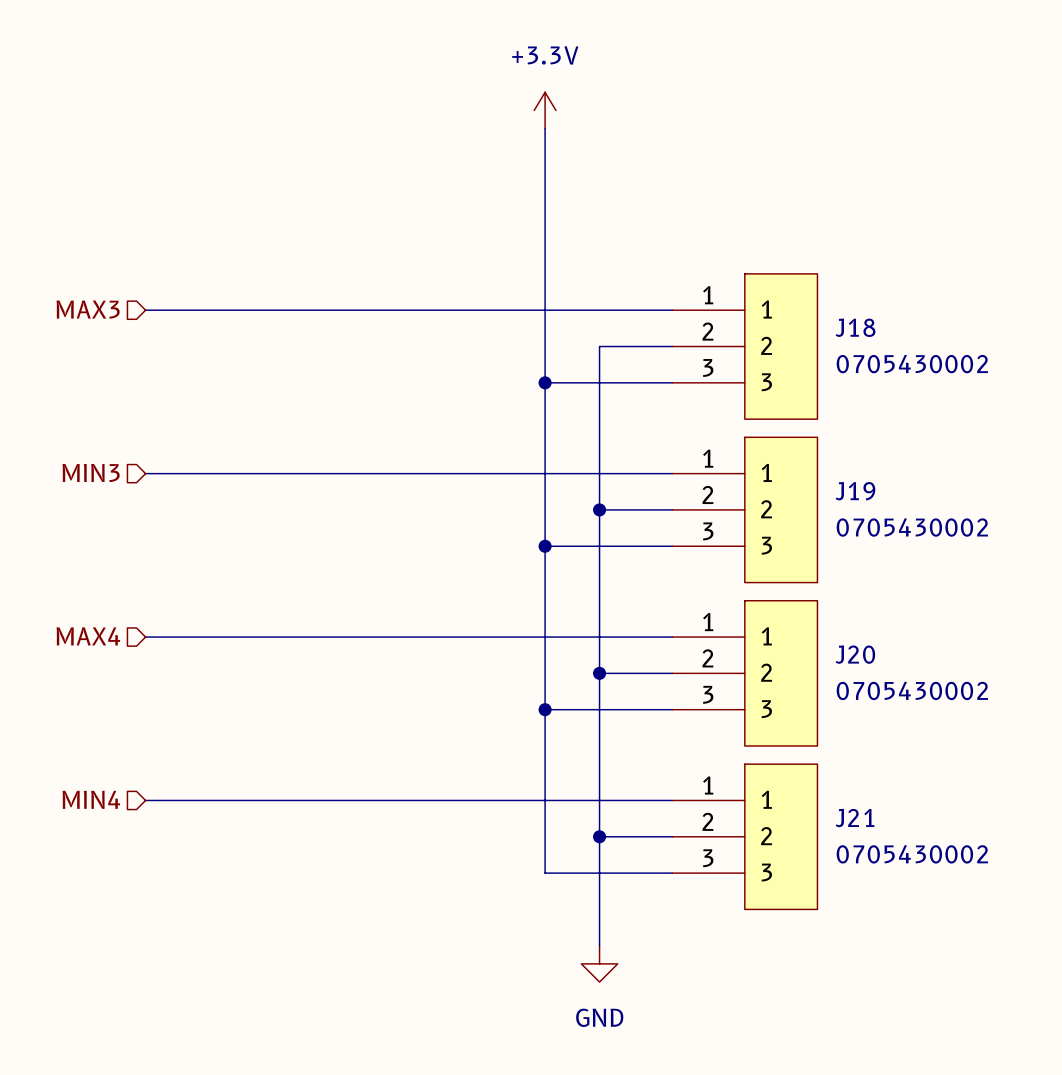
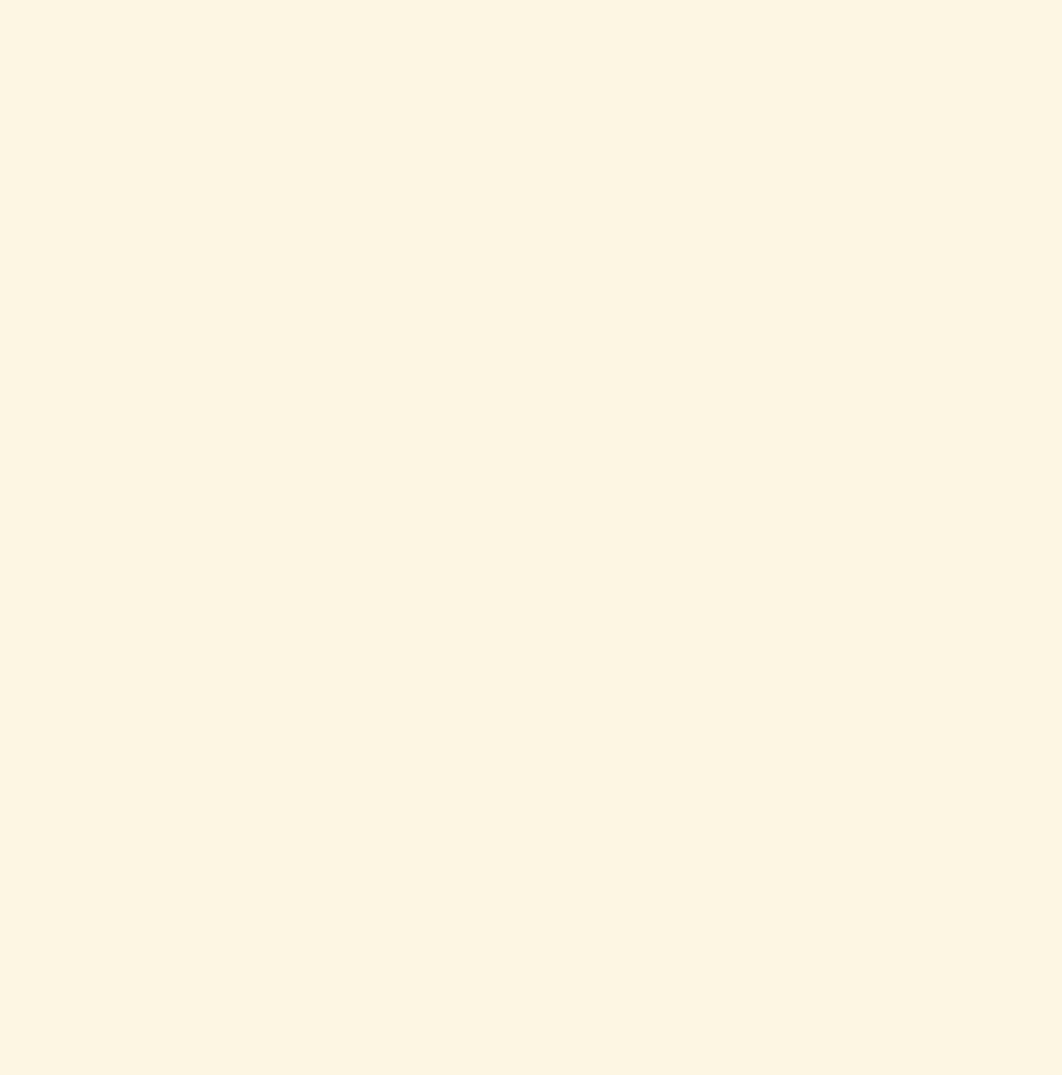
power symbol: +3.3V (545, 110) -> none
wire: (545, 128) (545, 873) (672, 873) -> none
hierarchical label: MAX3 (88, 309) -> none
wire: (145, 310) (672, 310) -> none
wire: (672, 346) (599, 346) (599, 945) -> none
J18: 0705430002 (744, 346) -> none
wire: (545, 382) (672, 382) -> none
junction: (545, 382) -> none
hierarchical label: MIN3 (91, 472) -> none
wire: (145, 473) (672, 473) -> none
wire: (599, 509) (672, 509) -> none
junction: (599, 509) -> none
J19: 0705430002 (744, 509) -> none
wire: (545, 546) (672, 546) -> none
junction: (545, 546) -> none
hierarchical label: MAX4 (88, 636) -> none
wire: (145, 637) (672, 637) -> none
wire: (599, 673) (672, 673) -> none
junction: (599, 673) -> none
J20: 0705430002 (744, 673) -> none
wire: (545, 709) (672, 709) -> none
junction: (545, 709) -> none
hierarchical label: MIN4 (91, 799) -> none
wire: (145, 800) (672, 800) -> none
wire: (599, 836) (672, 836) -> none
junction: (599, 836) -> none
J21: 0705430002 (744, 836) -> none
power symbol: GND (599, 963) -> none

